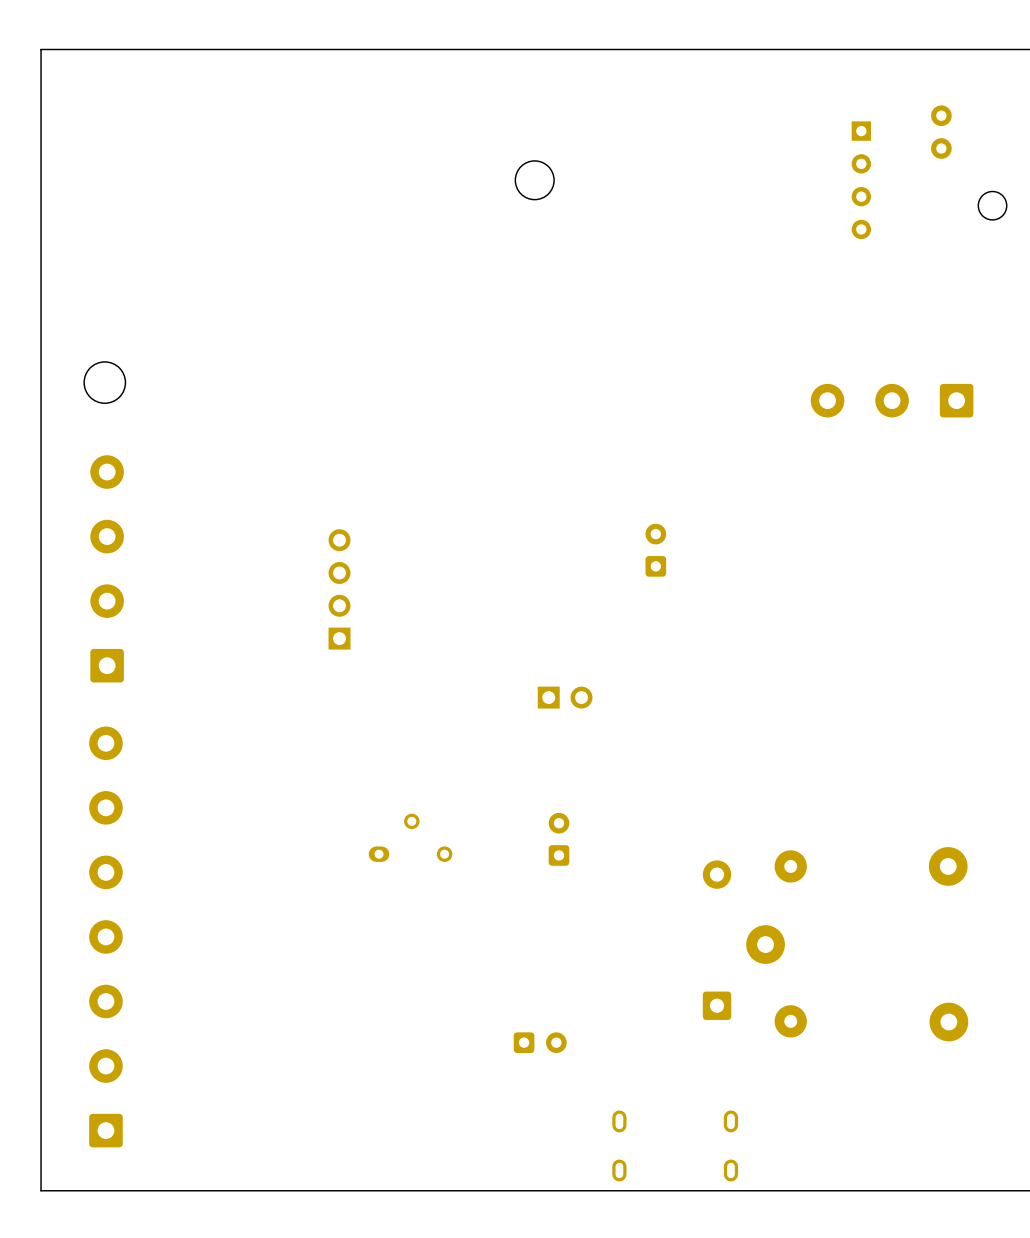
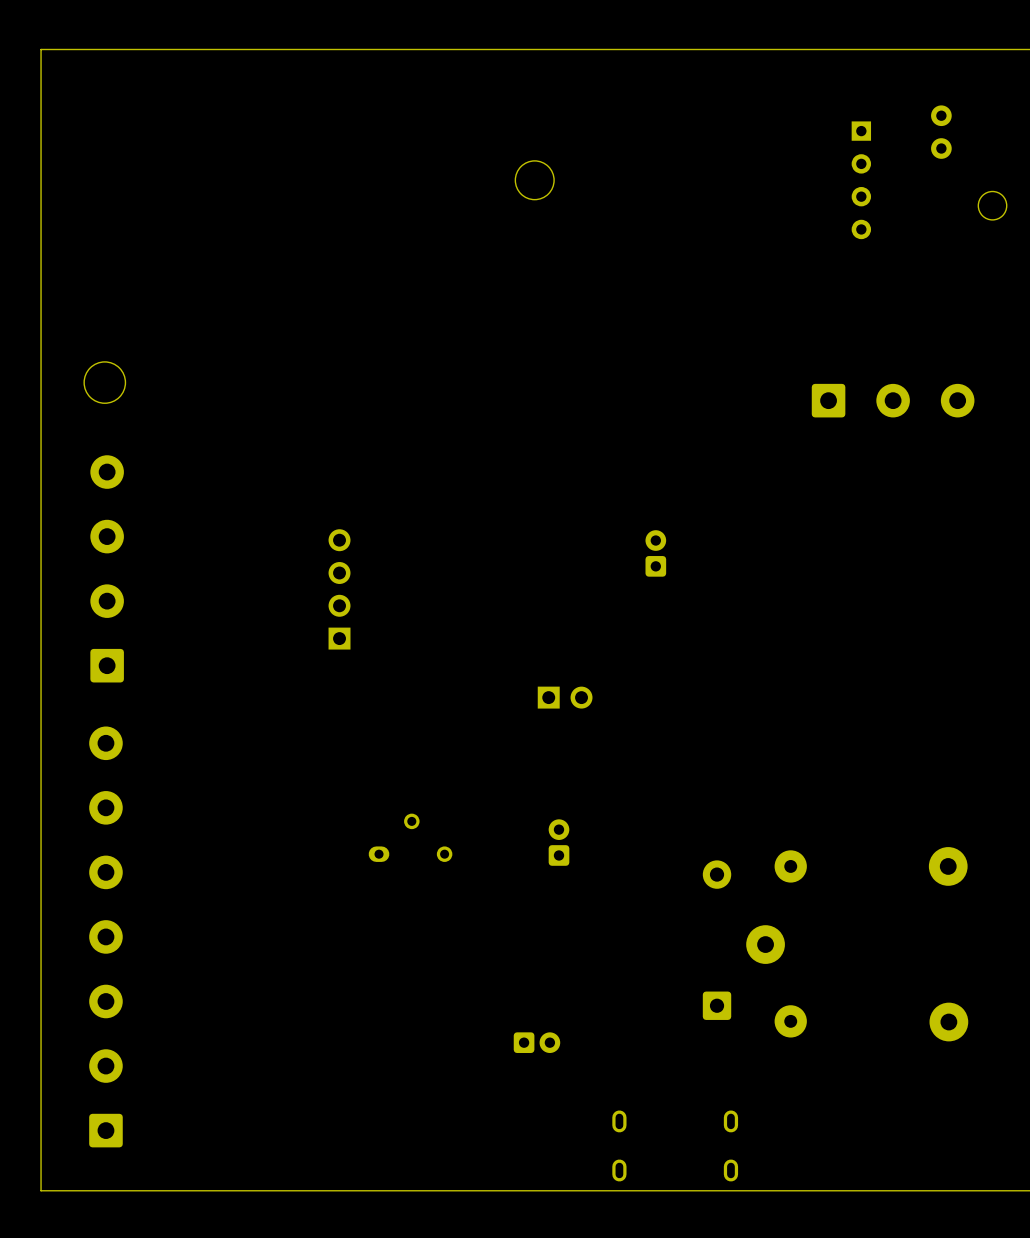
part rotation: 0° (892, 400) -> 180° (893, 400)
part footprint: [645, 523, 667, 577] -> [645, 530, 667, 577]
part footprint: [548, 812, 570, 866] -> [548, 819, 570, 866]
part footprint: [513, 1032, 567, 1054] -> [513, 1032, 561, 1054]

